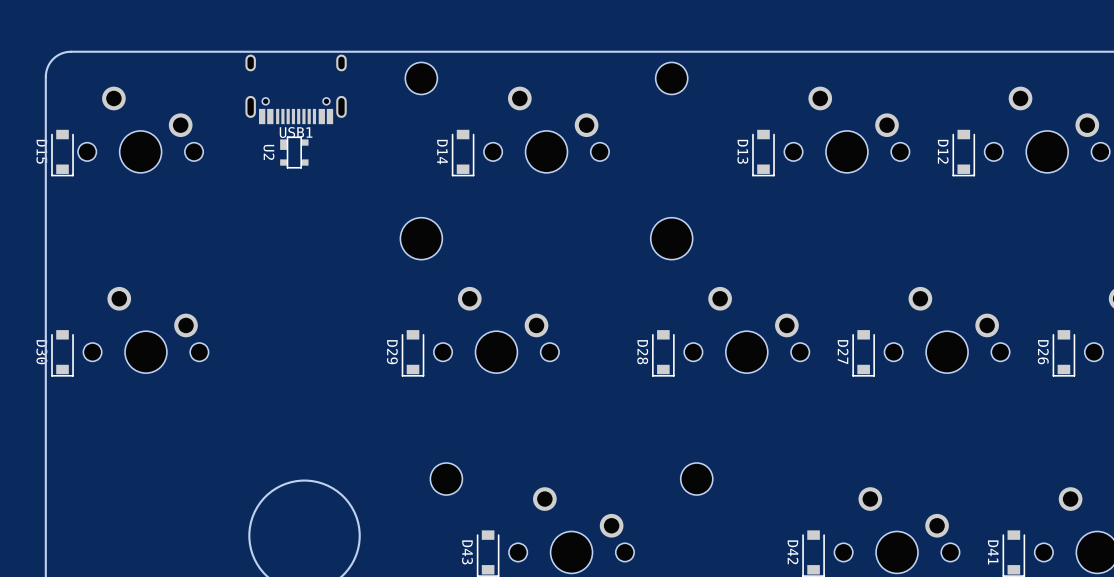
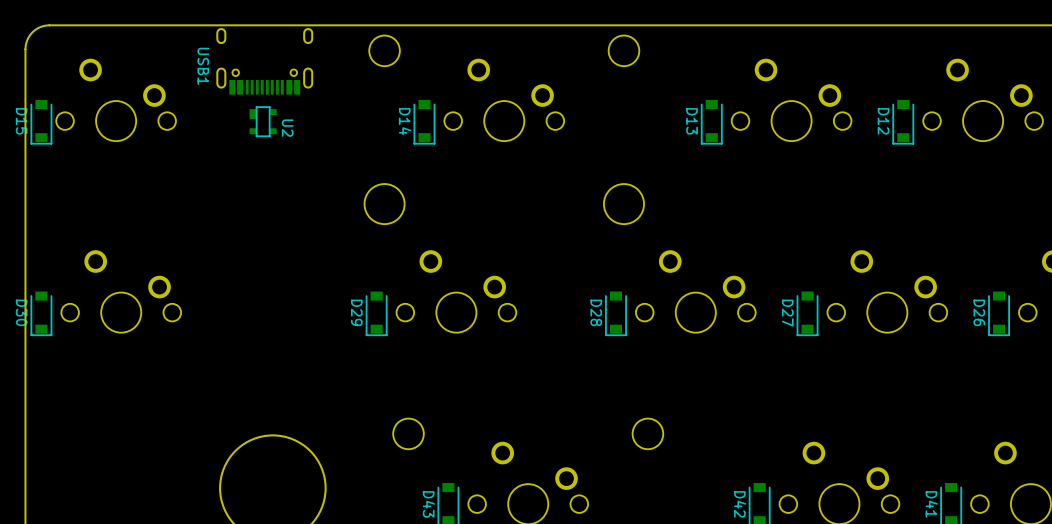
USB1 name rotation: 0° (296, 132) -> 90° clockwise (203, 66)
USB1 name position: USB1 (296, 132) -> USB1 (203, 66)
U2 name position: U2 (268, 152) -> U2 (287, 128)

